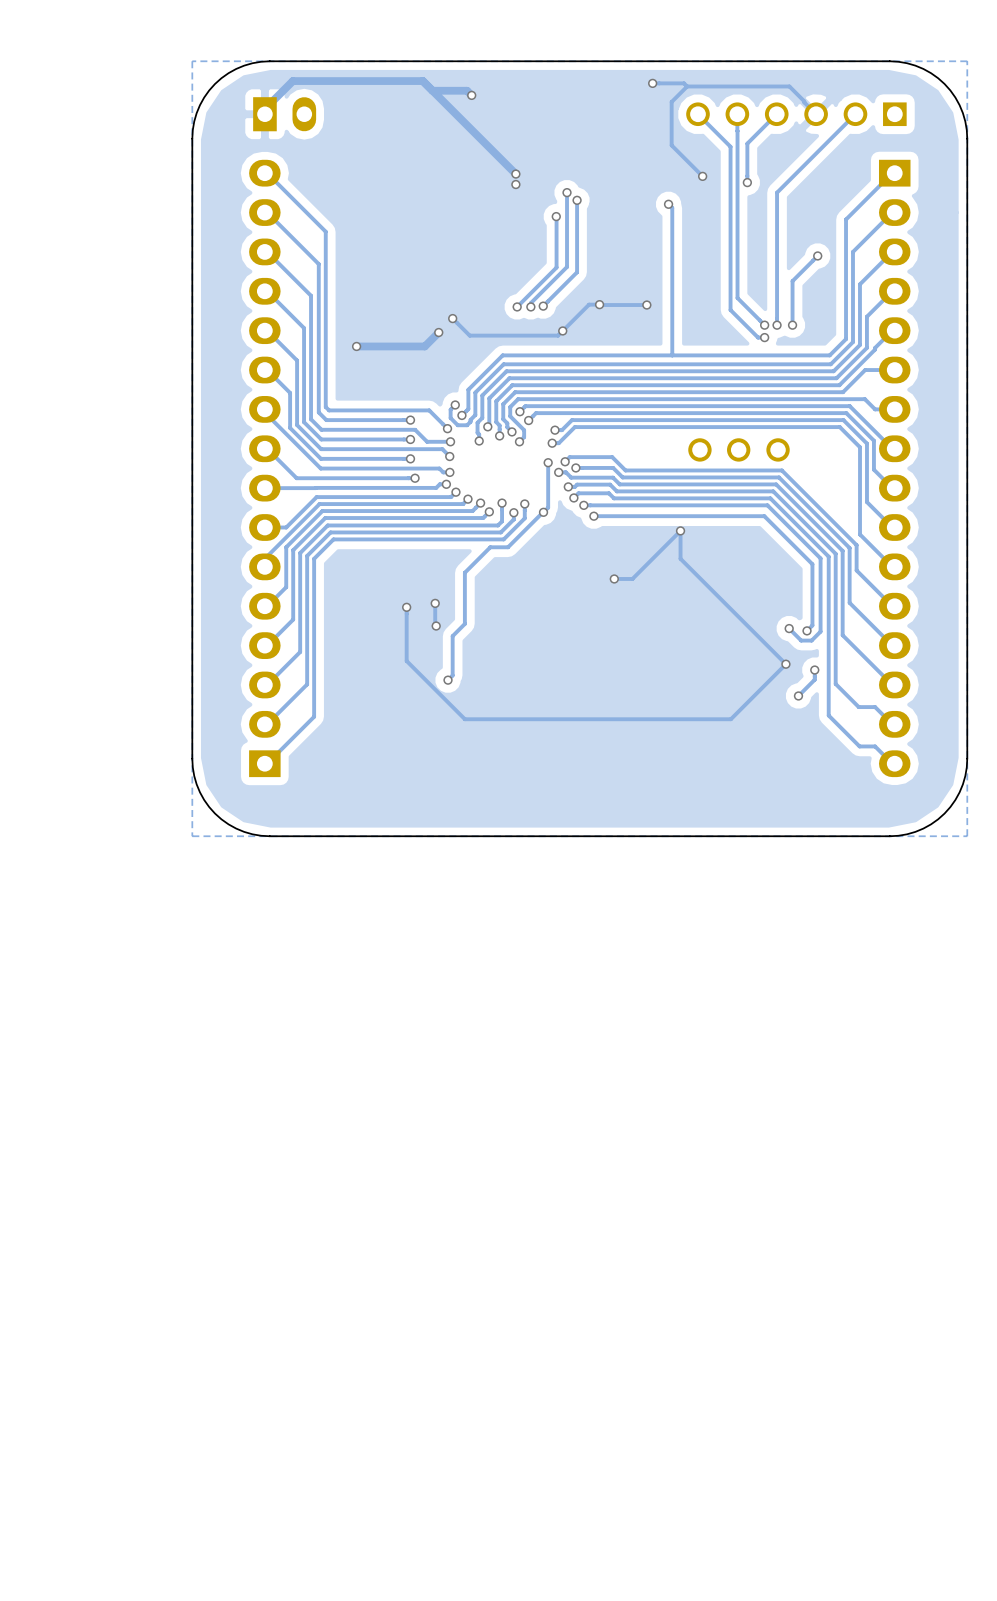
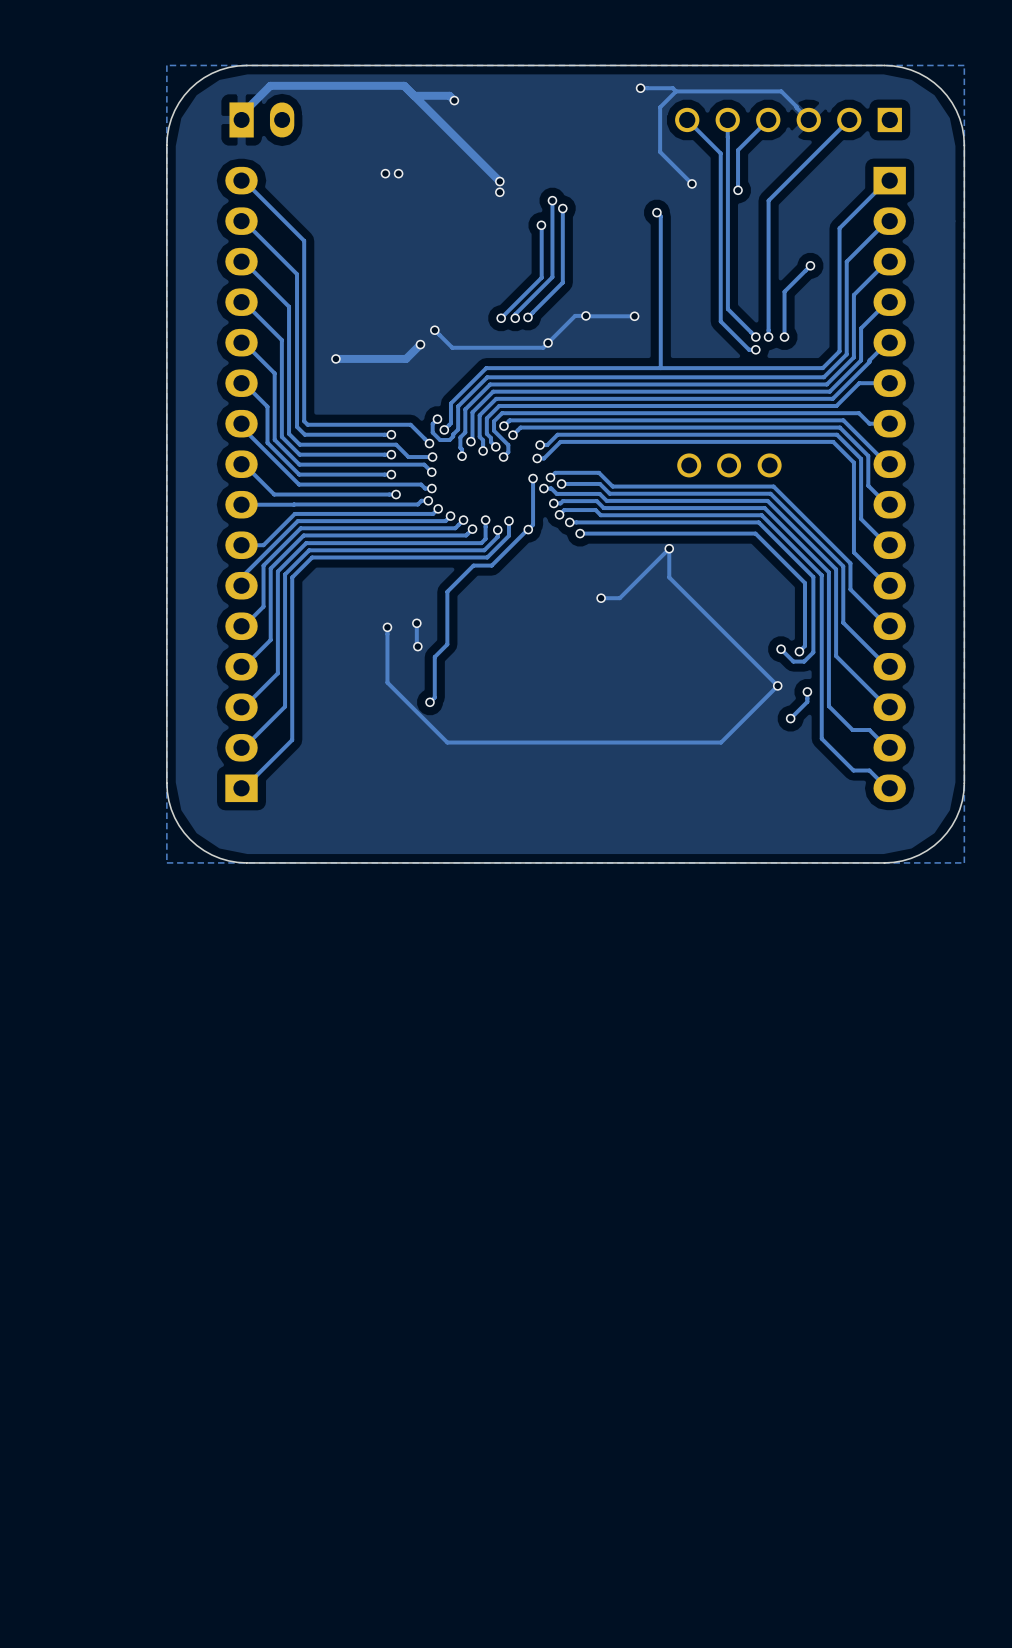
via: none -> (385, 173)
via: none -> (398, 173)

